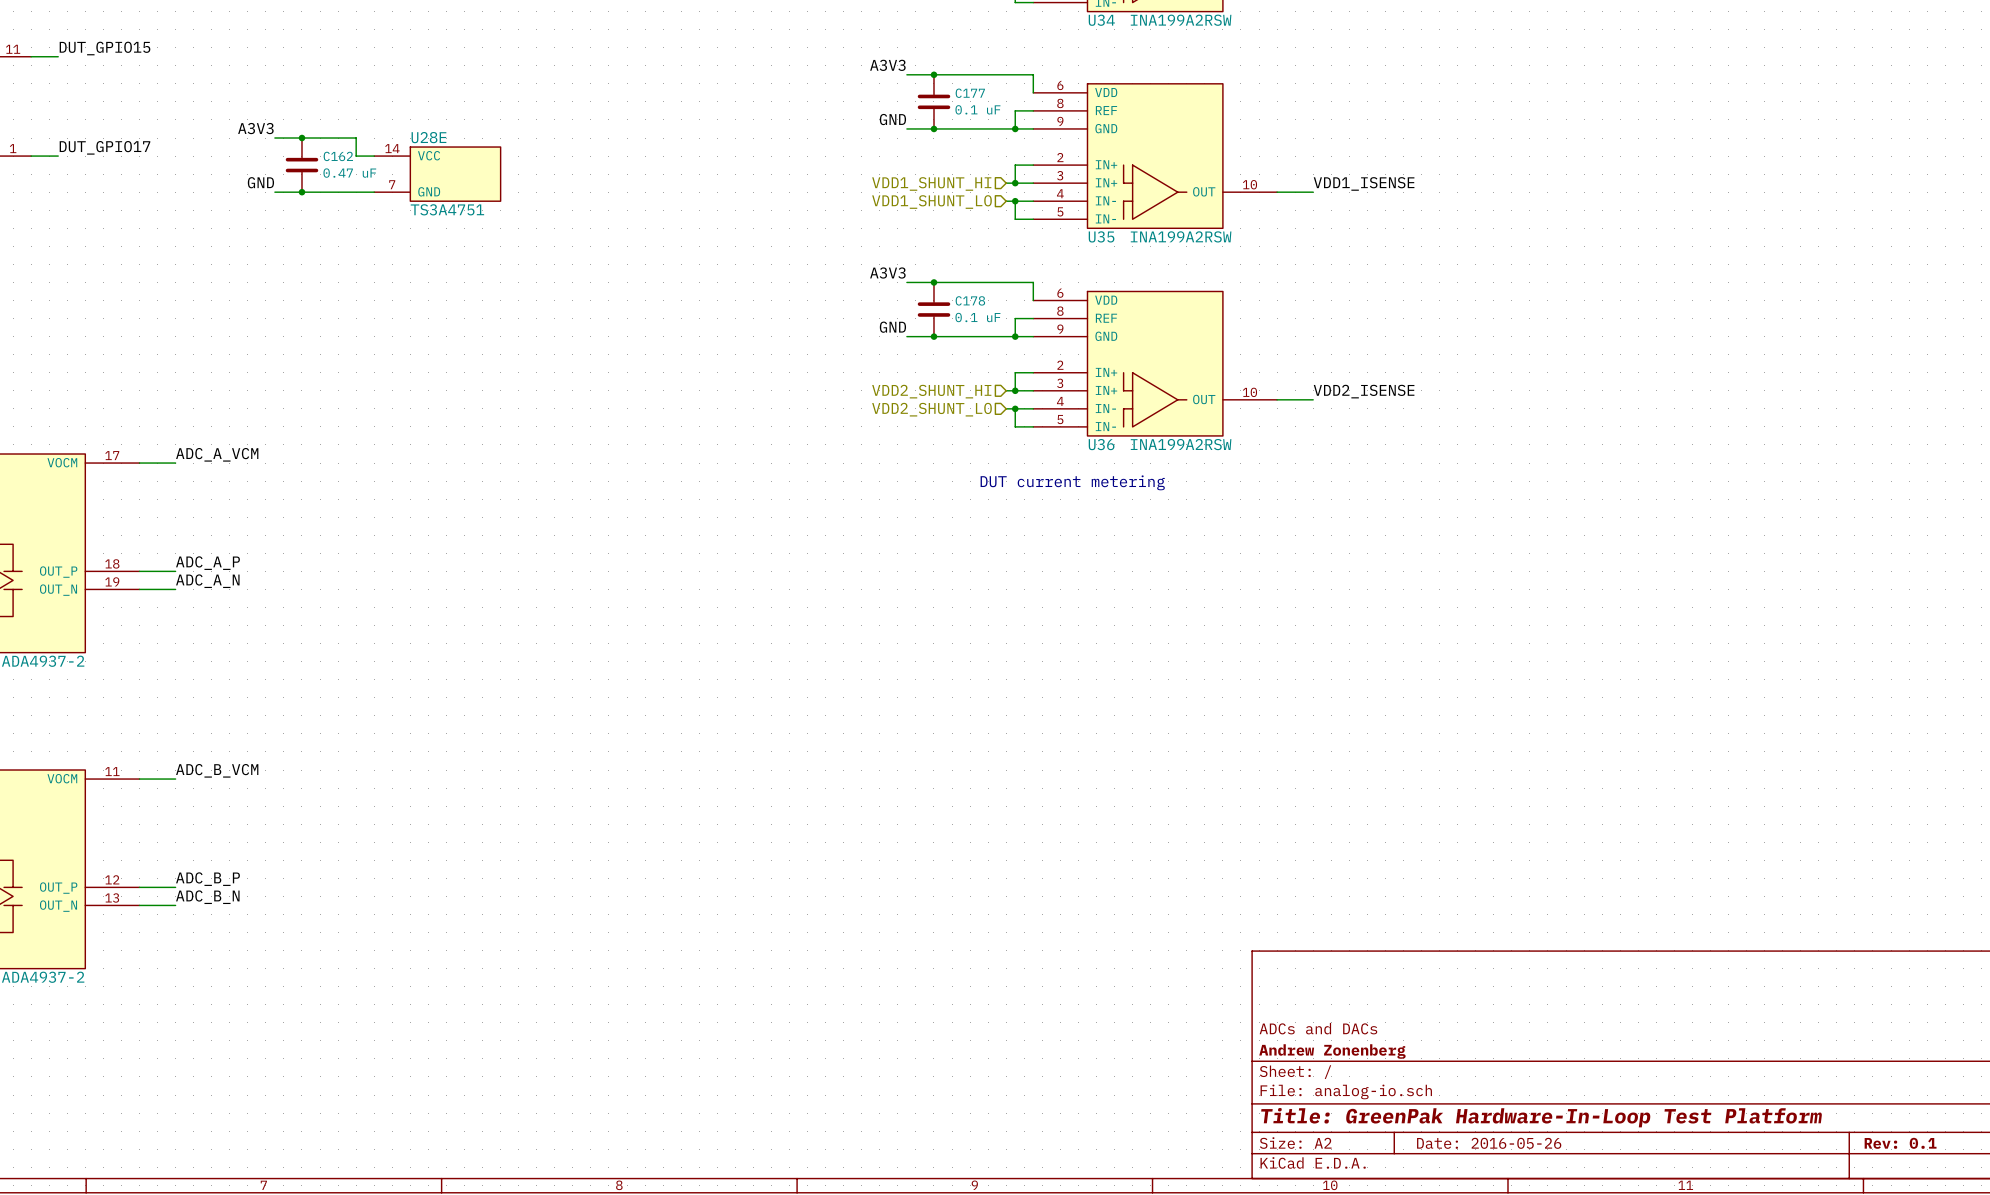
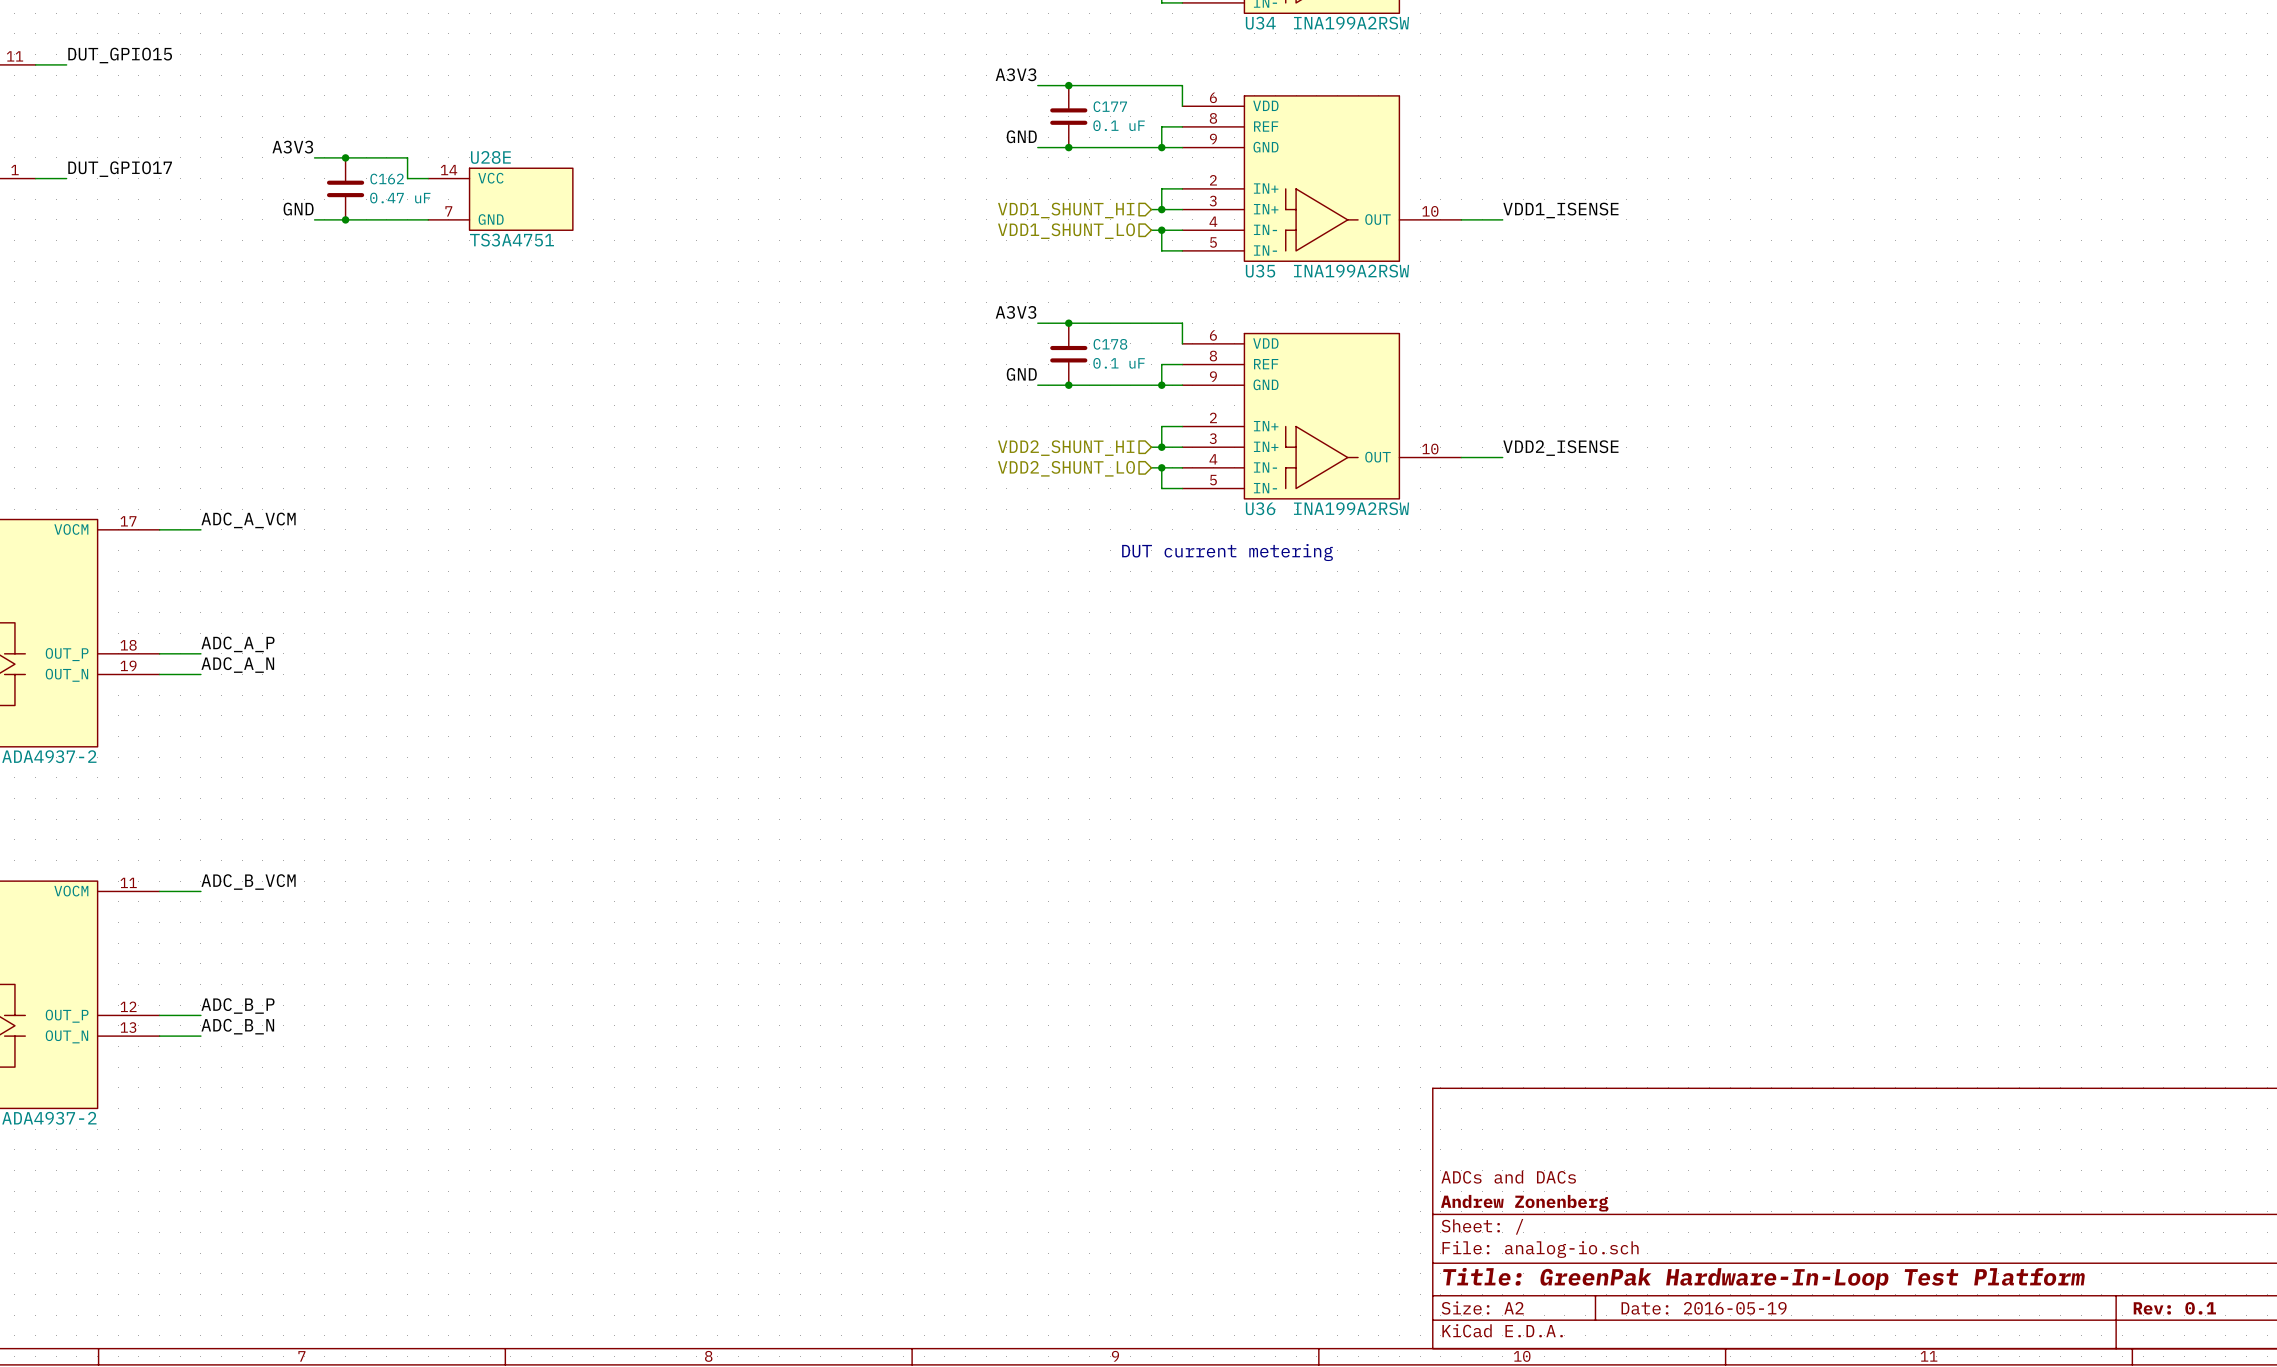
title block: Date: 2016-05-26 (1489, 1143) -> Date: 2016-05-19 (1704, 1308)

